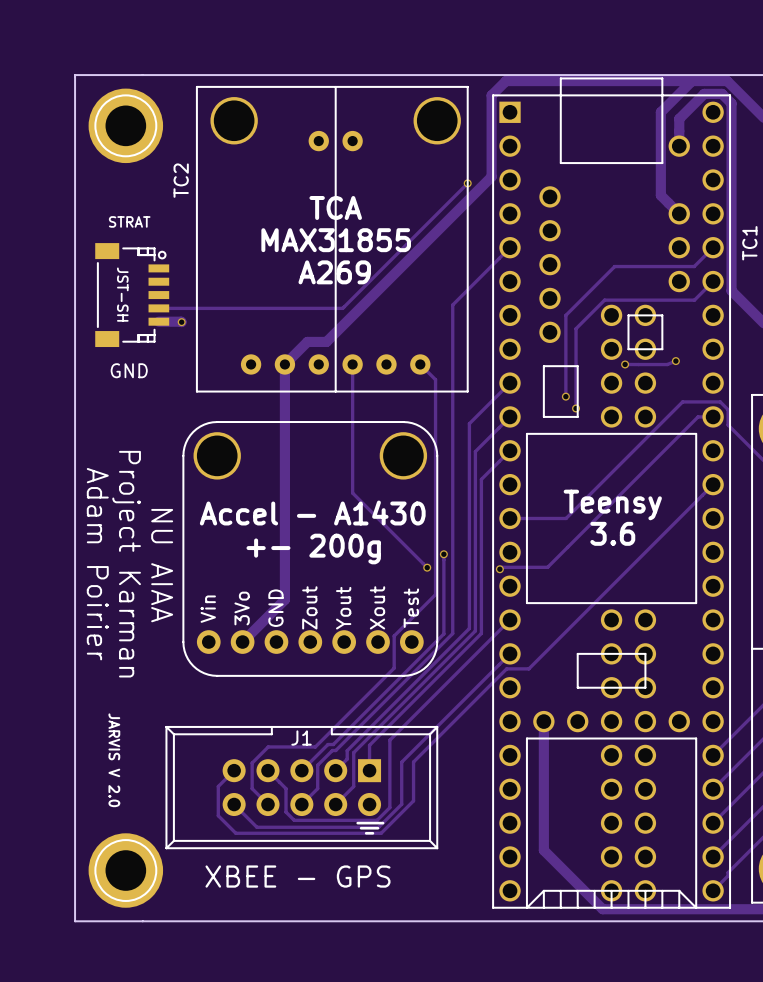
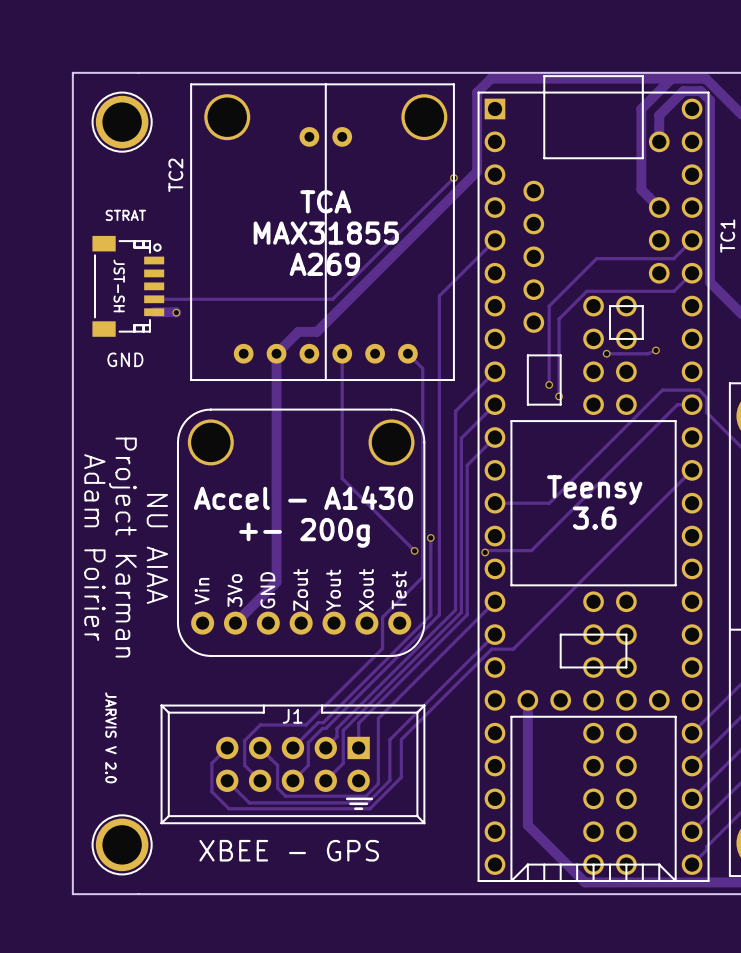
part footprint: [88, 88, 164, 164] -> [91, 91, 153, 153]
part footprint: [88, 833, 164, 908] -> [91, 814, 153, 876]

